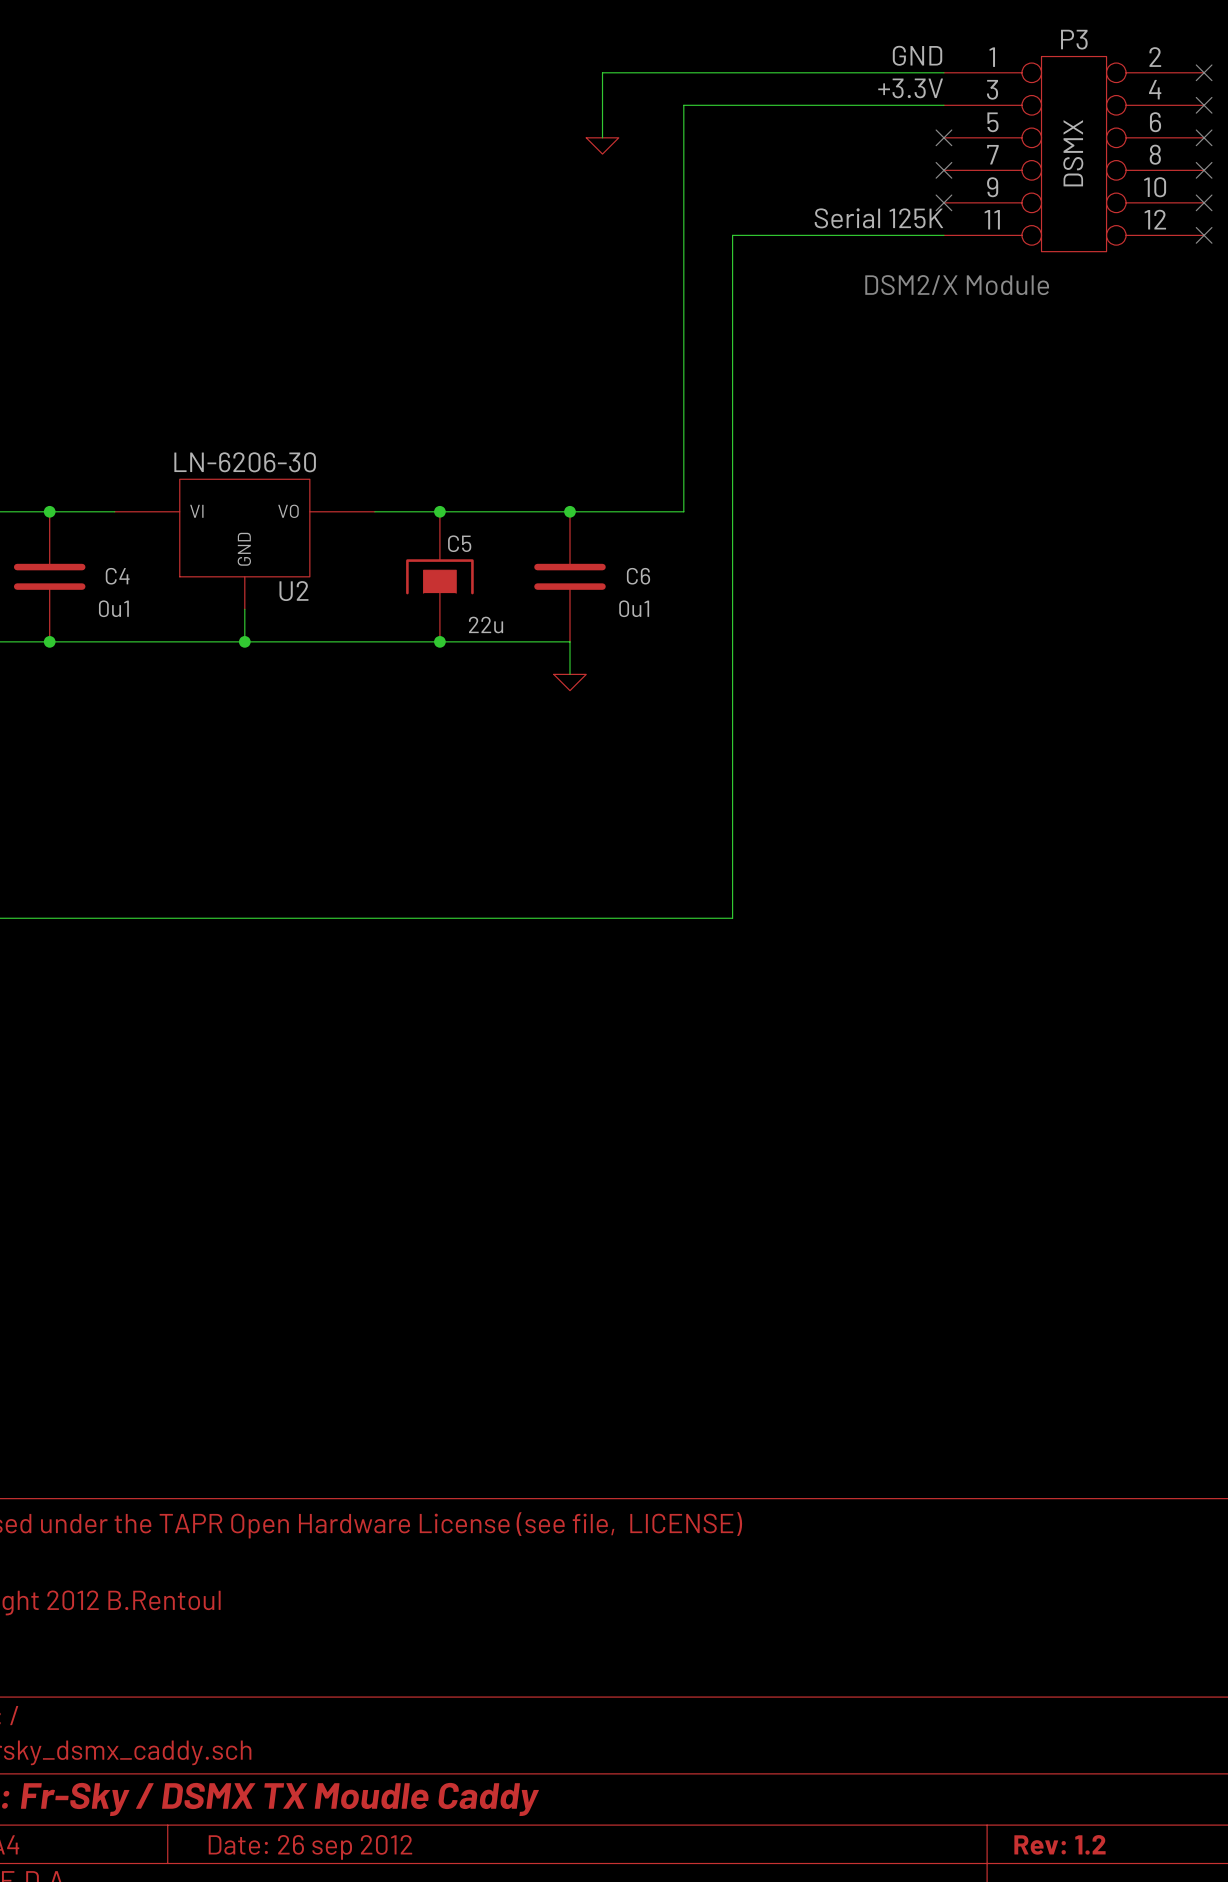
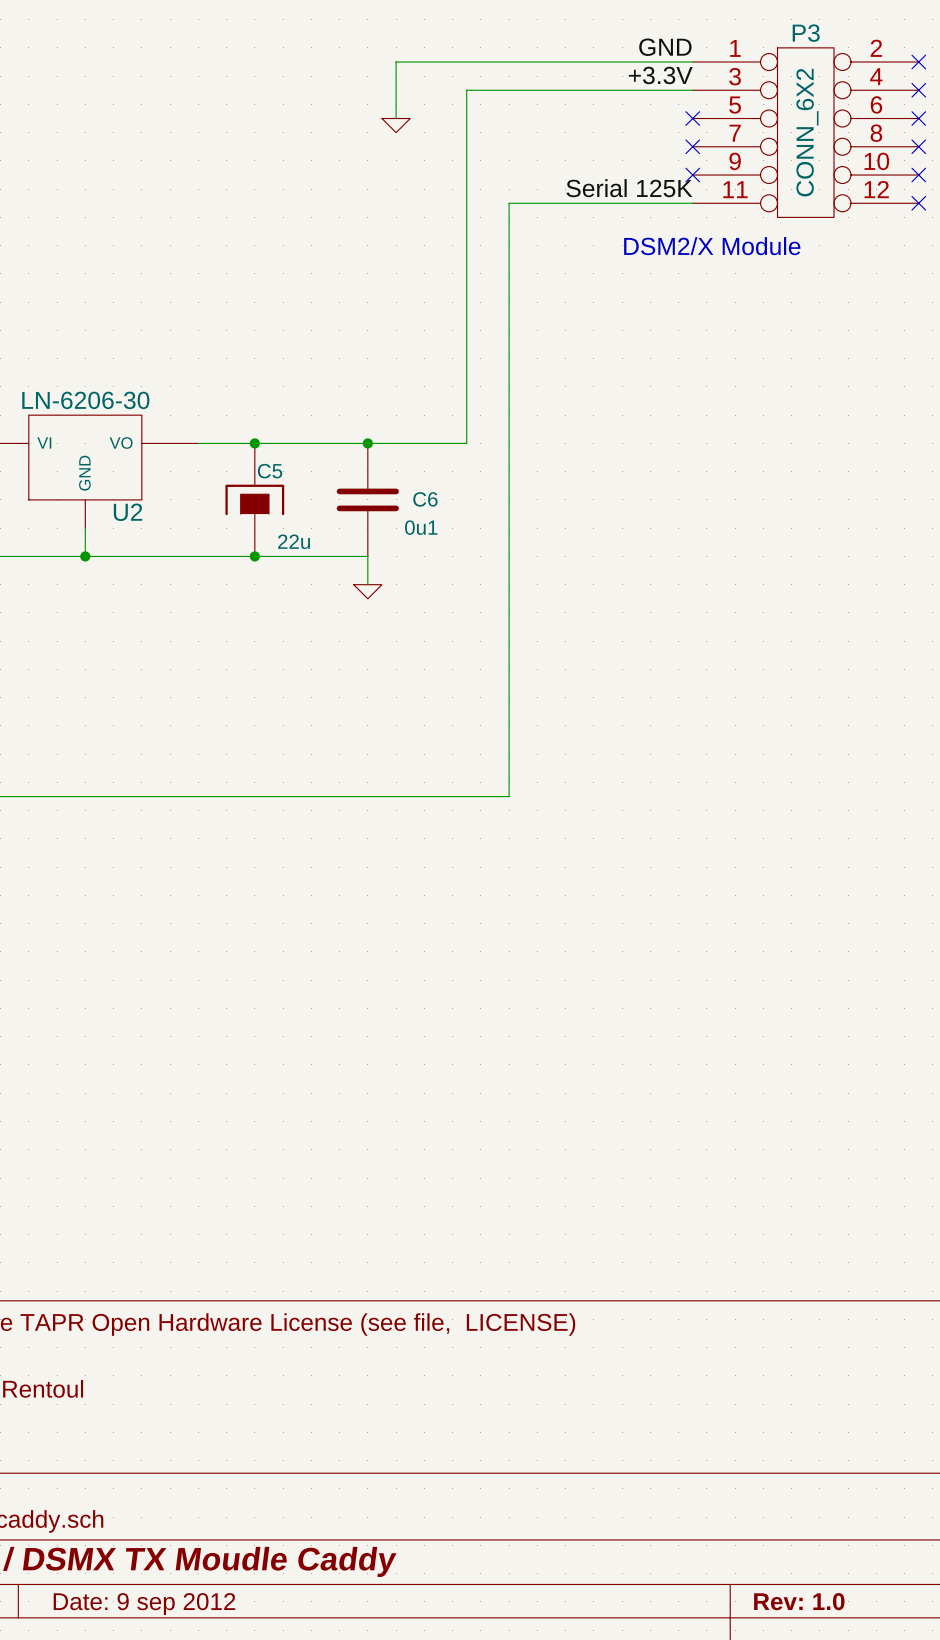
P3 value: DSMX (1073, 153) -> CONN_6X2 (807, 132)
title block: Rev: 1.2 (1060, 1844) -> Rev: 1.0 (799, 1601)
title block: Date: 26 sep 2012 (310, 1847) -> Date: 9 sep 2012 (144, 1604)

